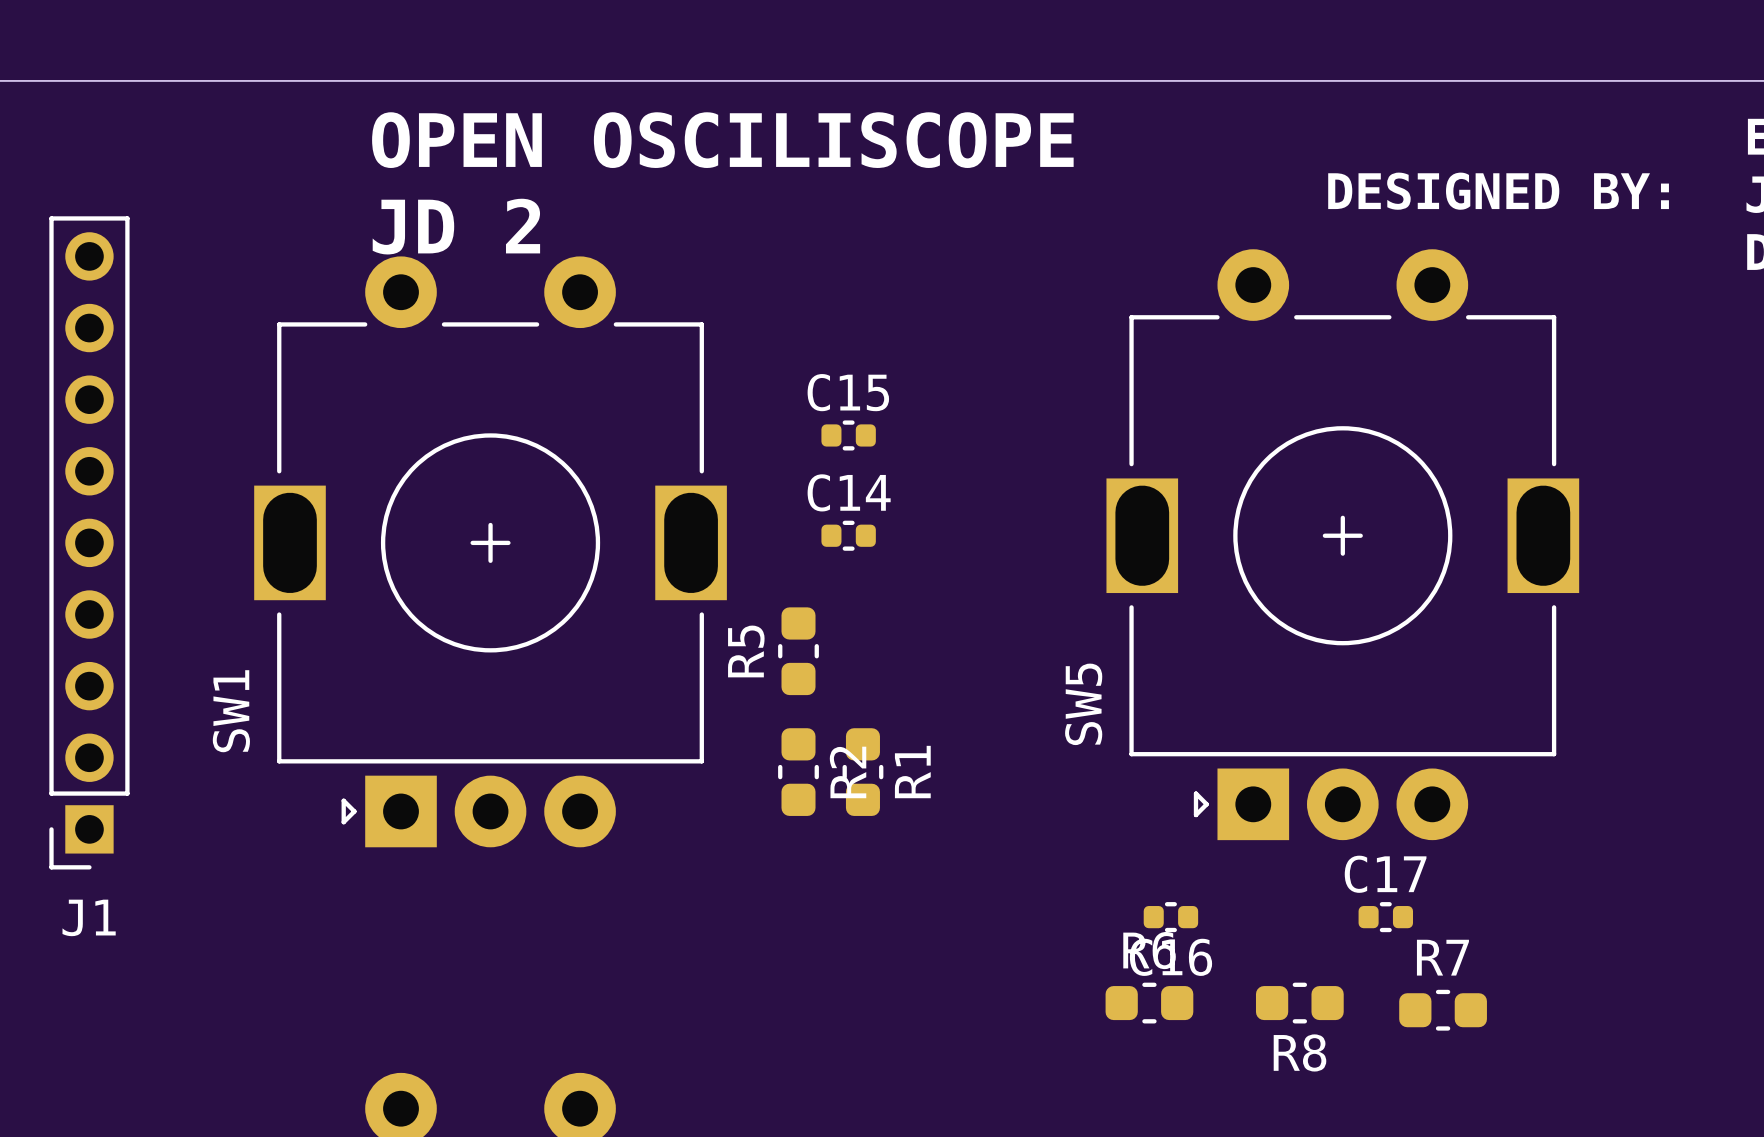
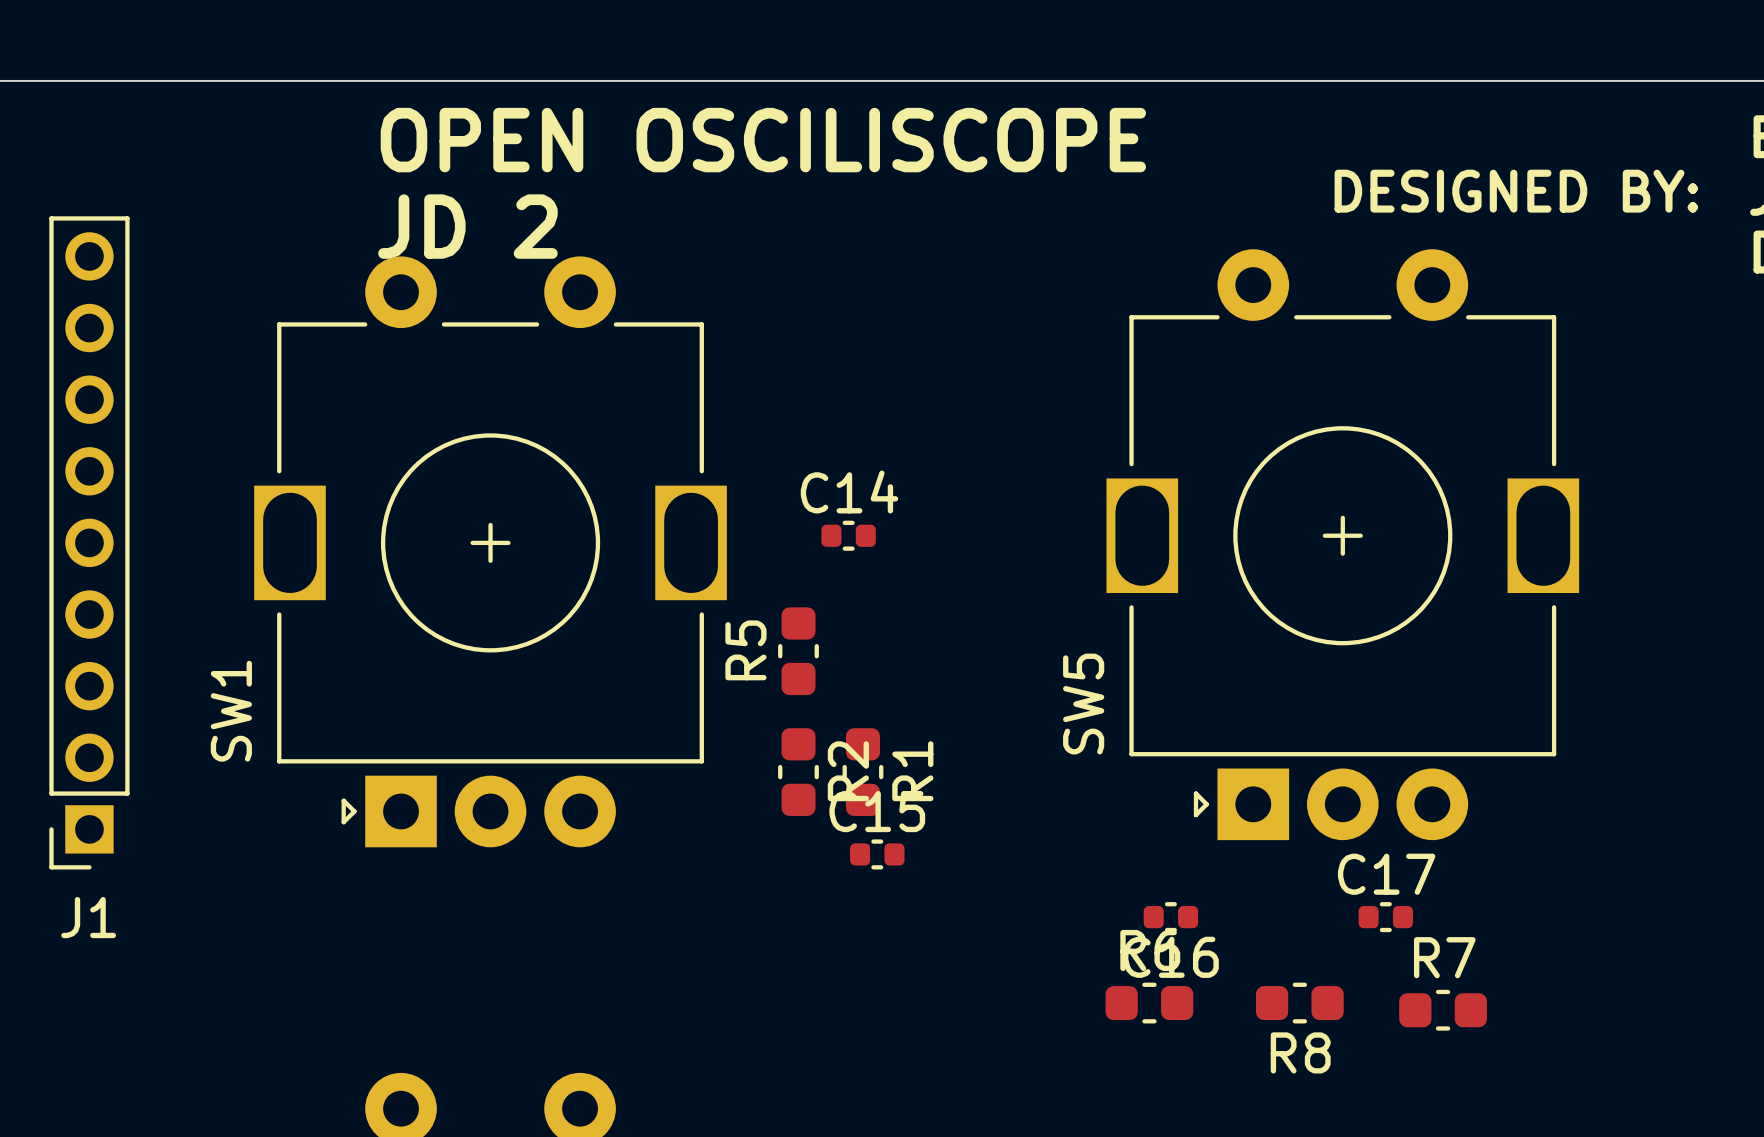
C15 position: (848, 435) -> (877, 854)

